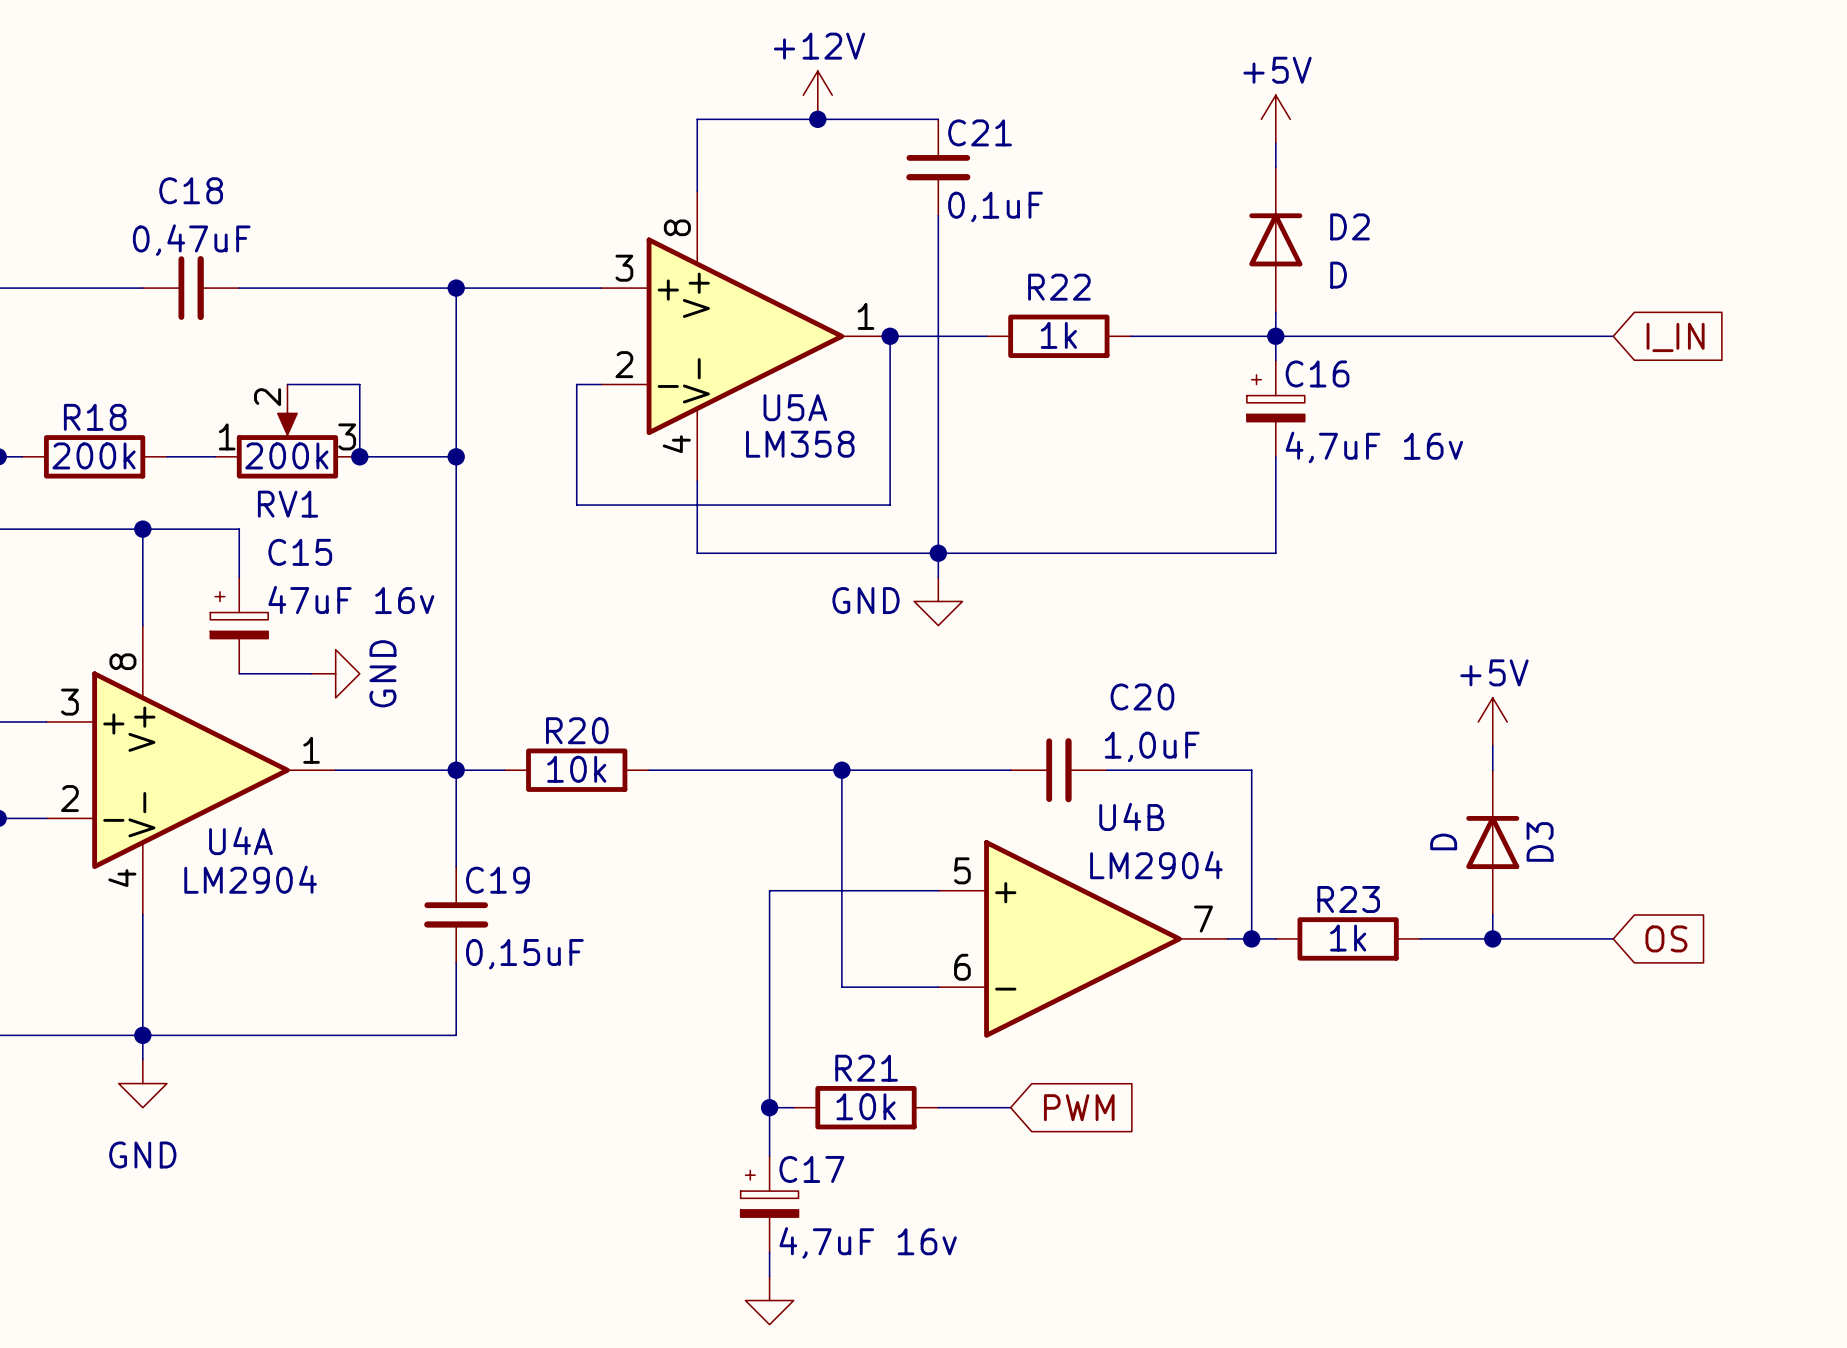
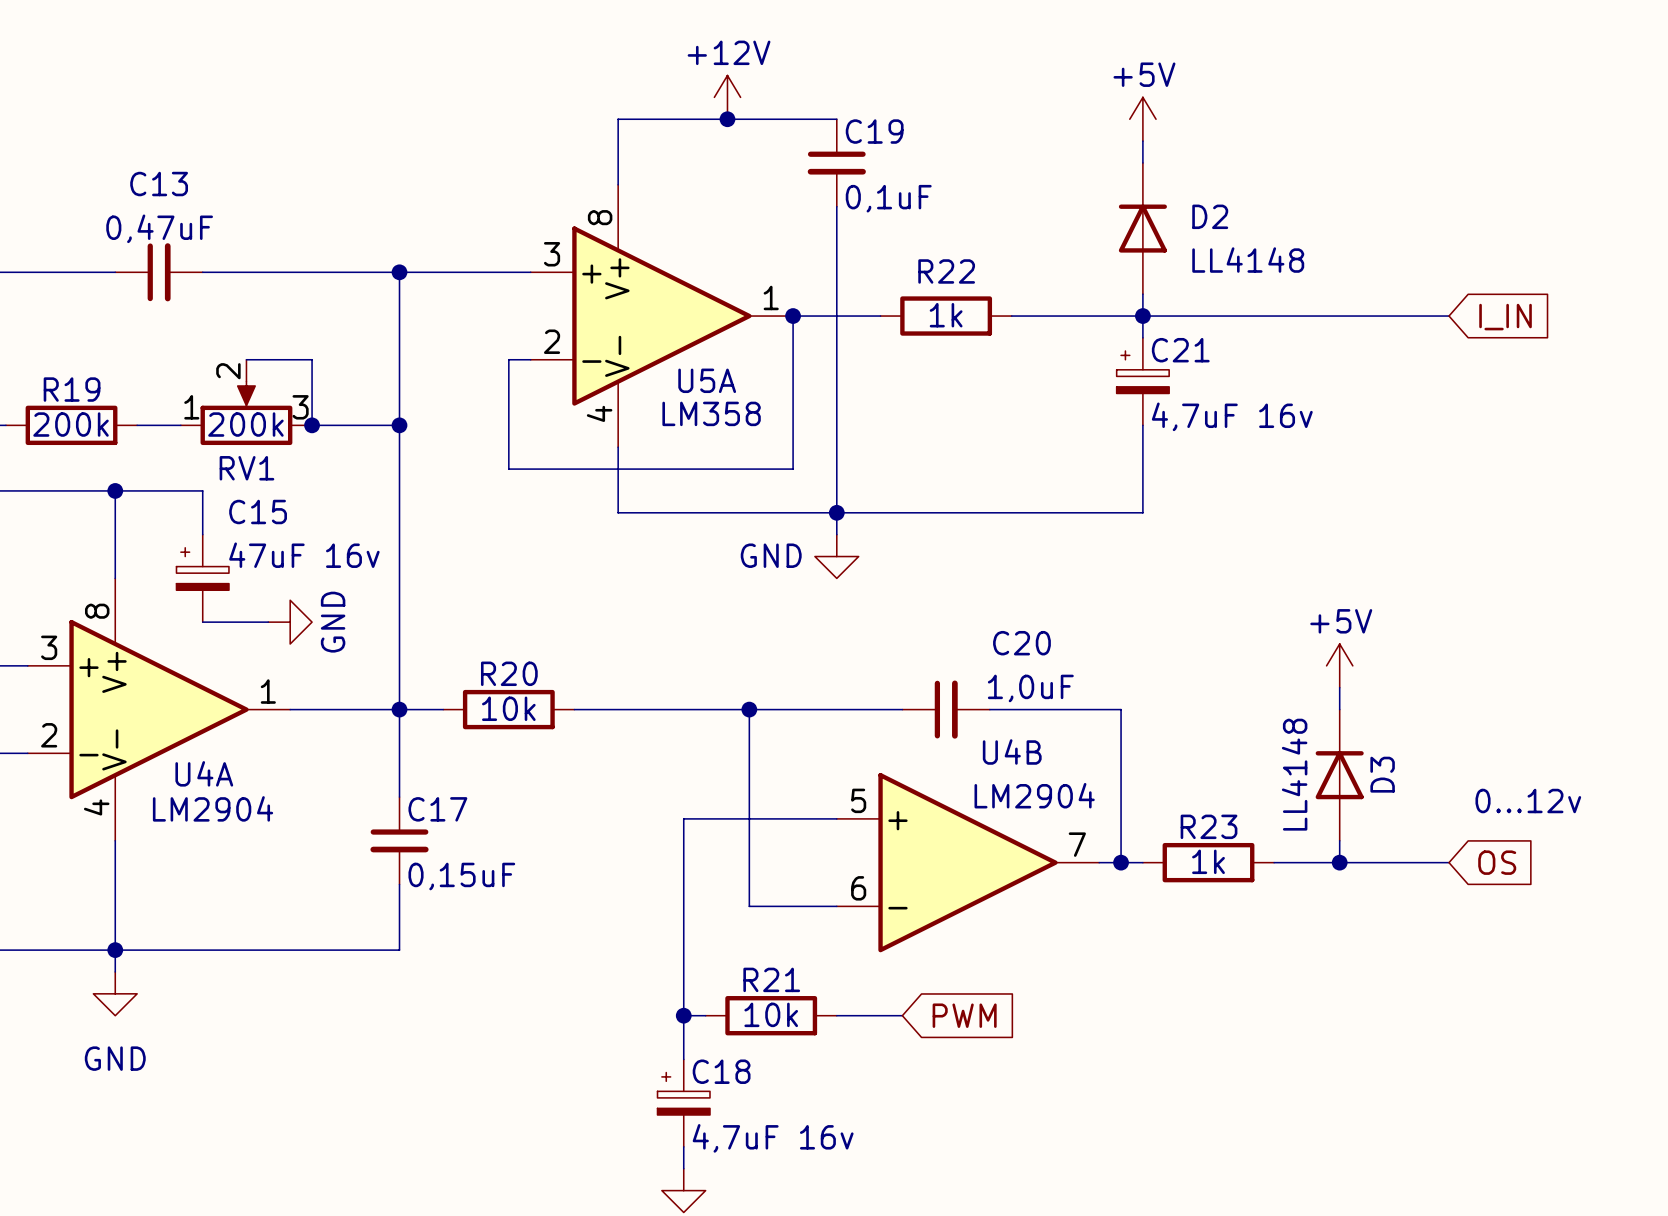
C21 name: C21 (980, 132) -> C19 (874, 131)
C18 name: C18 (191, 190) -> C13 (159, 184)
D2 value: D (1338, 275) -> LL4148 (1248, 260)
C16 name: C16 (1317, 373) -> C21 (1180, 350)
R18 name: R18 (95, 417) -> R19 (72, 389)
D3 value: D (1443, 841) -> LL4148 (1294, 774)
text: none -> 0...12v (1528, 801)
C19 name: C19 (497, 880) -> C17 (437, 809)
C17 name: C17 (811, 1169) -> C18 (721, 1071)

